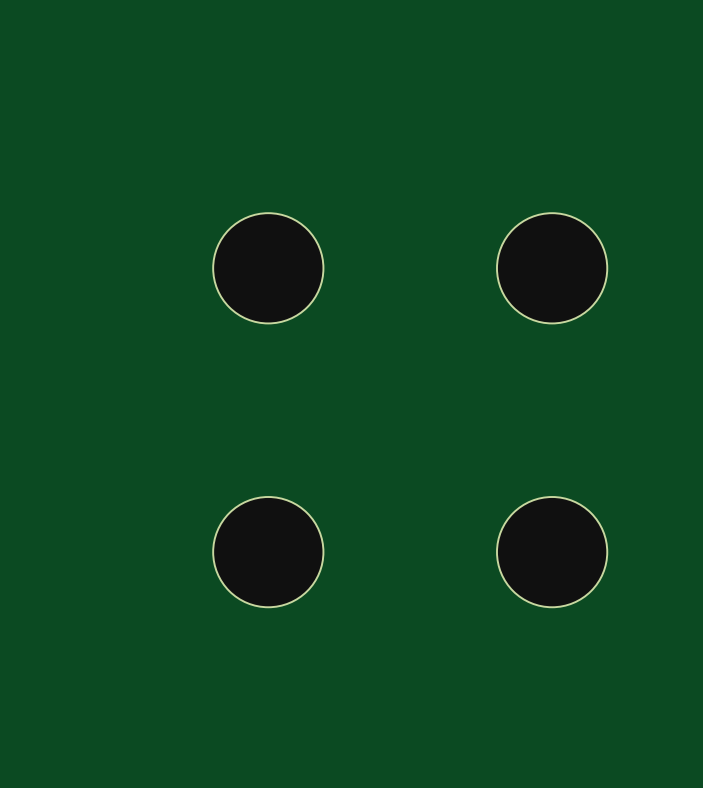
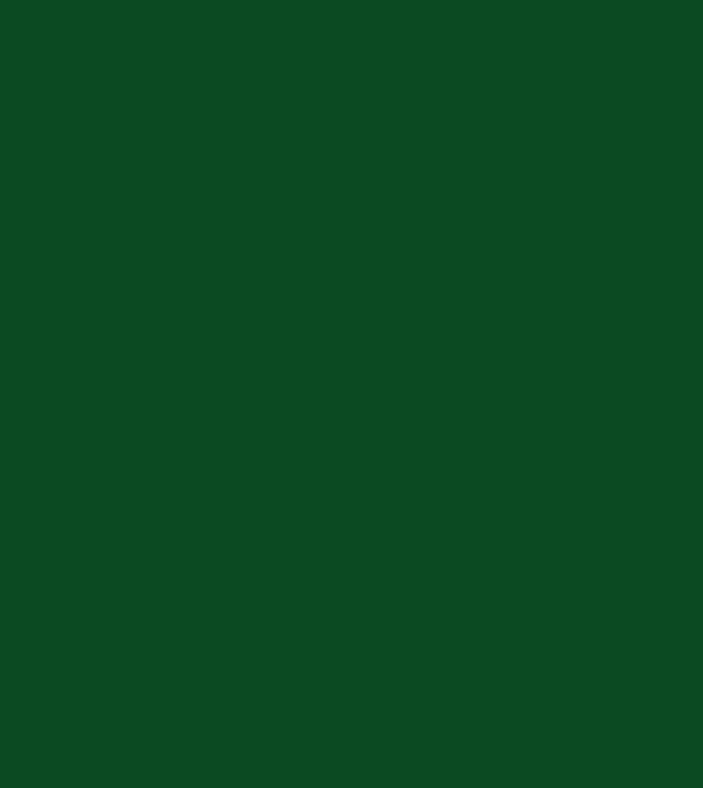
part: (268, 268) -> none
part: (552, 268) -> none
part: (268, 552) -> none
part: (552, 552) -> none

